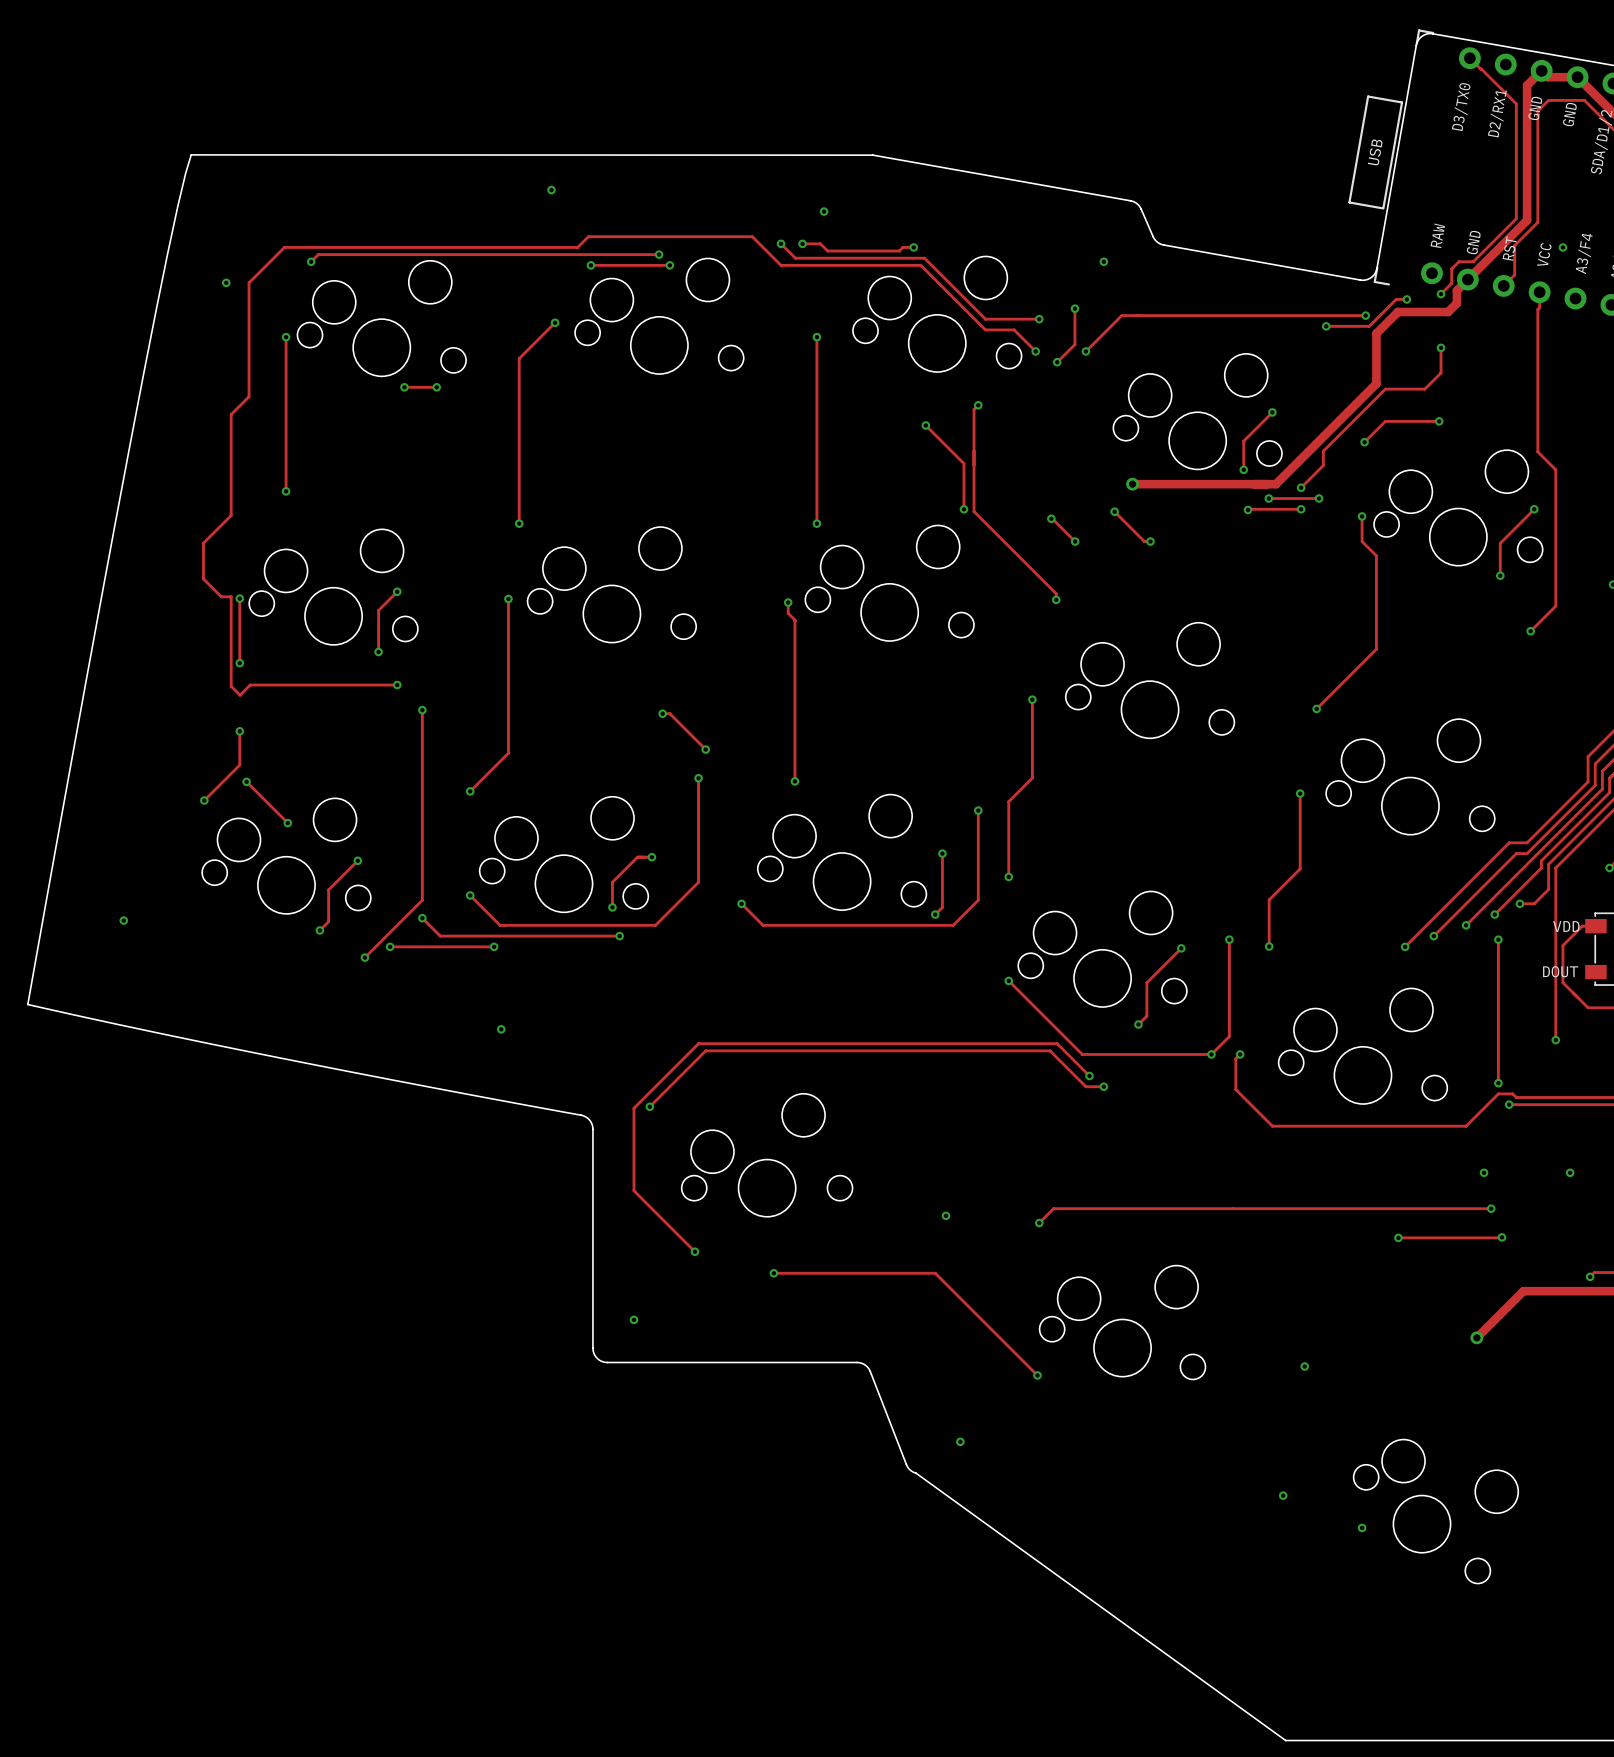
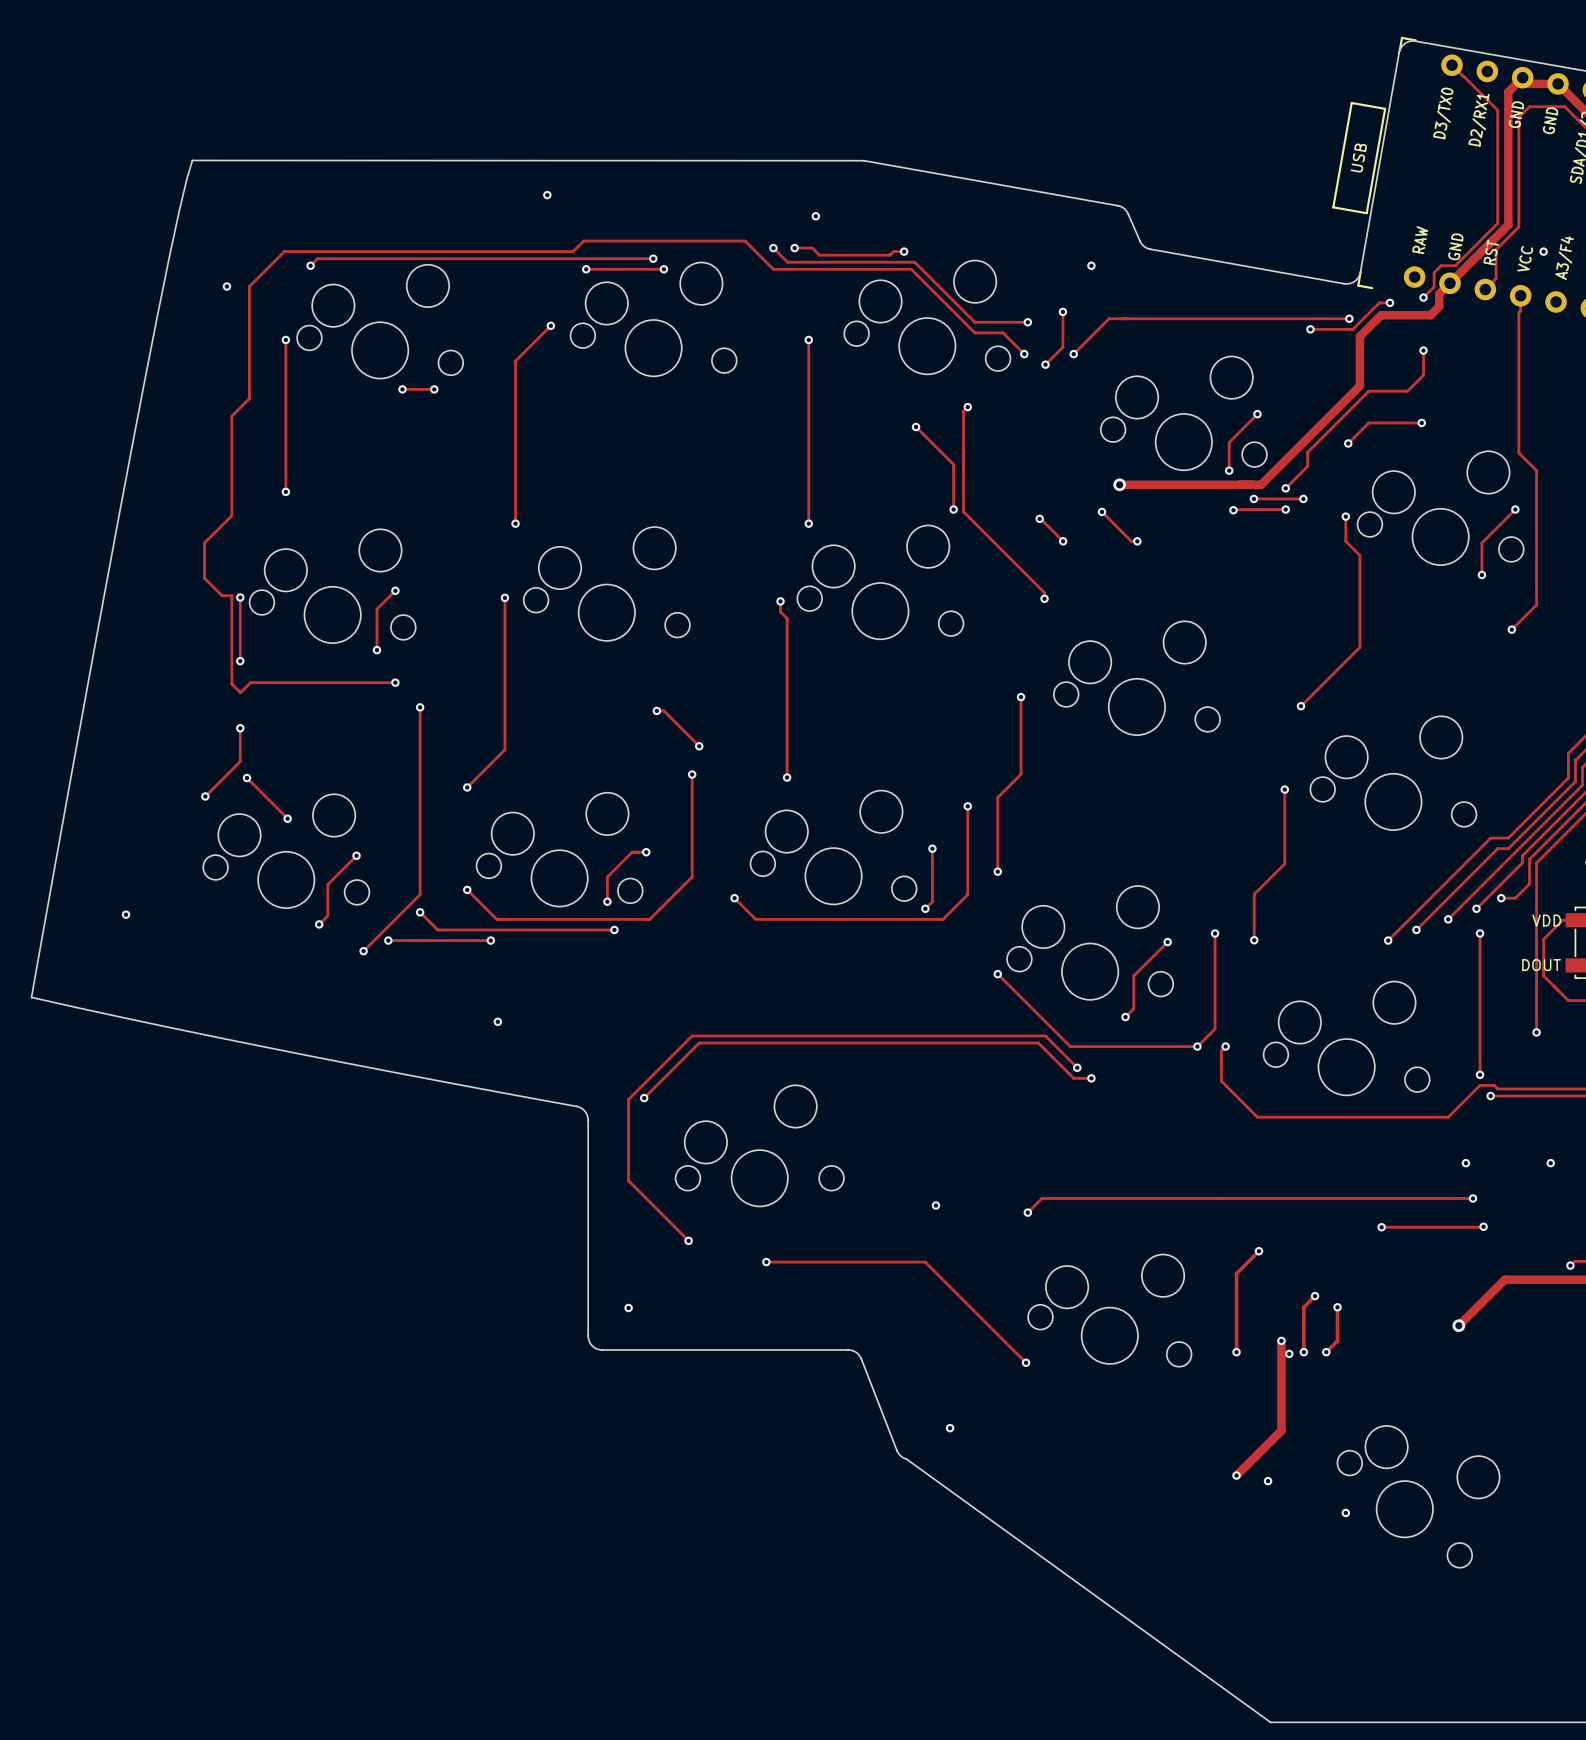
track: none -> (1258, 1251) (1236, 1273) (1236, 1352)
via: none -> (1258, 1251)
track: none -> (1315, 1296) (1303, 1307) (1303, 1352)
via: none -> (1315, 1296)
track: none -> (1337, 1307) (1337, 1340) (1326, 1352)
via: none -> (1337, 1307)
track: none -> (1281, 1340) (1281, 1430) (1236, 1475)
via: none -> (1281, 1340)
via: none -> (1236, 1352)
via: none -> (1303, 1352)
via: none -> (1326, 1352)
via: none -> (1236, 1475)

